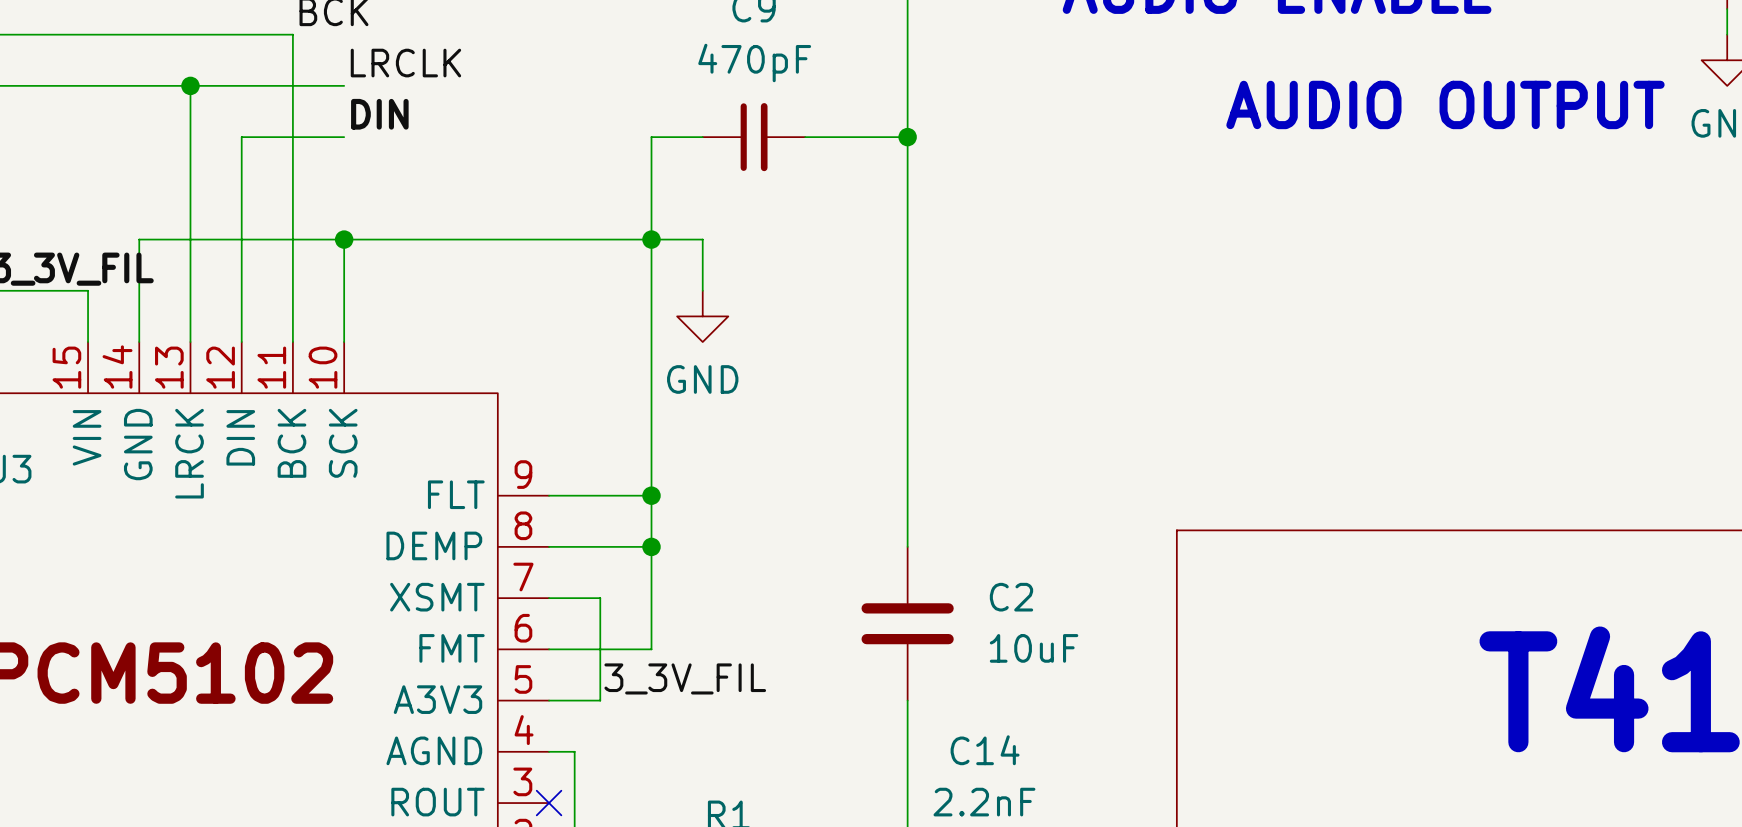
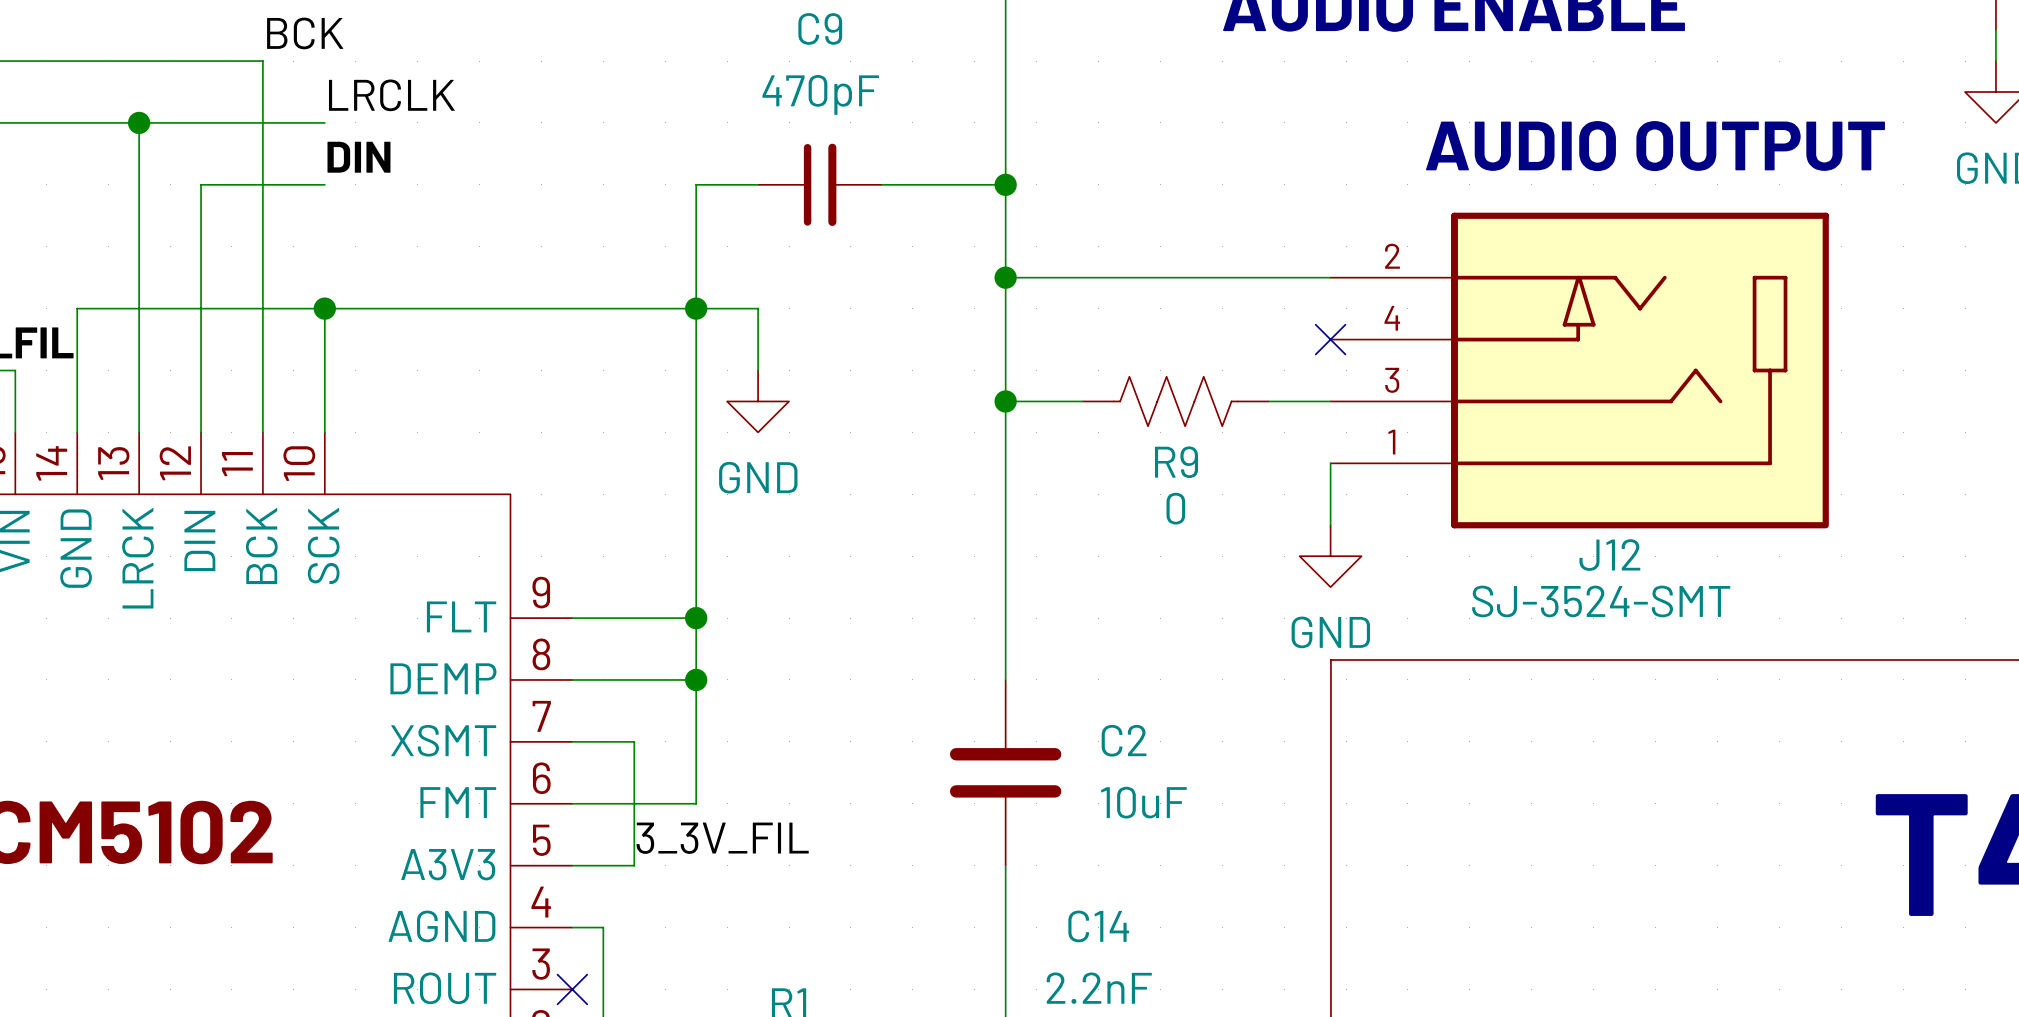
wire: none -> (1005, 277) (1330, 277)
junction: none -> (1005, 277)
no-connect mark: none -> (1330, 339)
J12: none -> SJ-3524-SMT (1579, 370)
wire: none -> (1005, 401) (1083, 401)
junction: none -> (1005, 401)
R9: none -> 0 (1175, 401)
wire: none -> (1268, 401) (1330, 401)
wire: none -> (1330, 463) (1330, 525)
power symbol: none -> GND (1330, 556)

